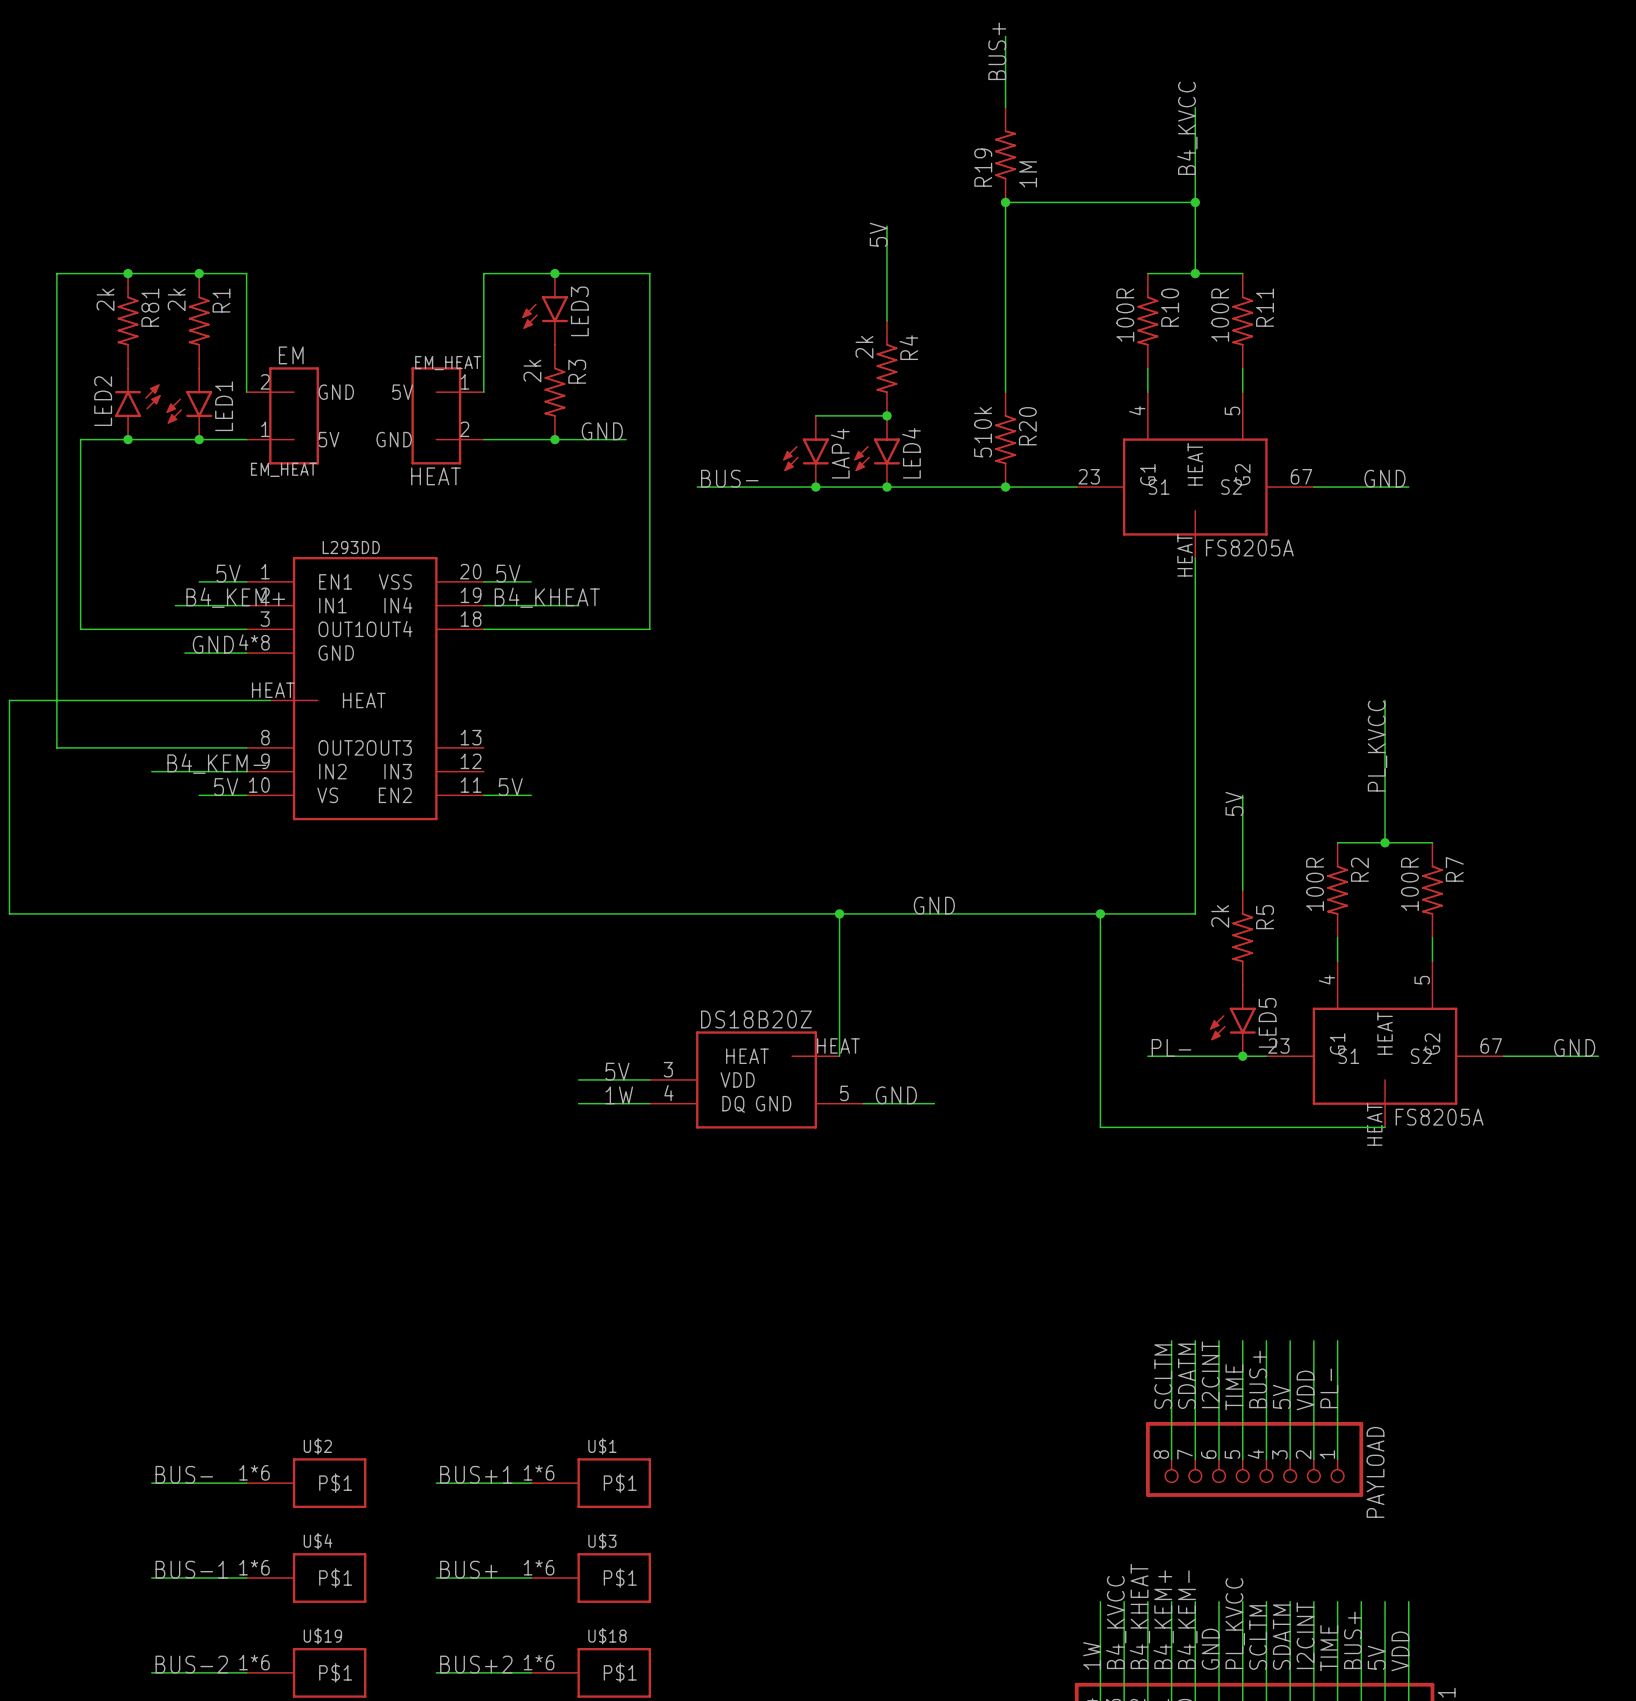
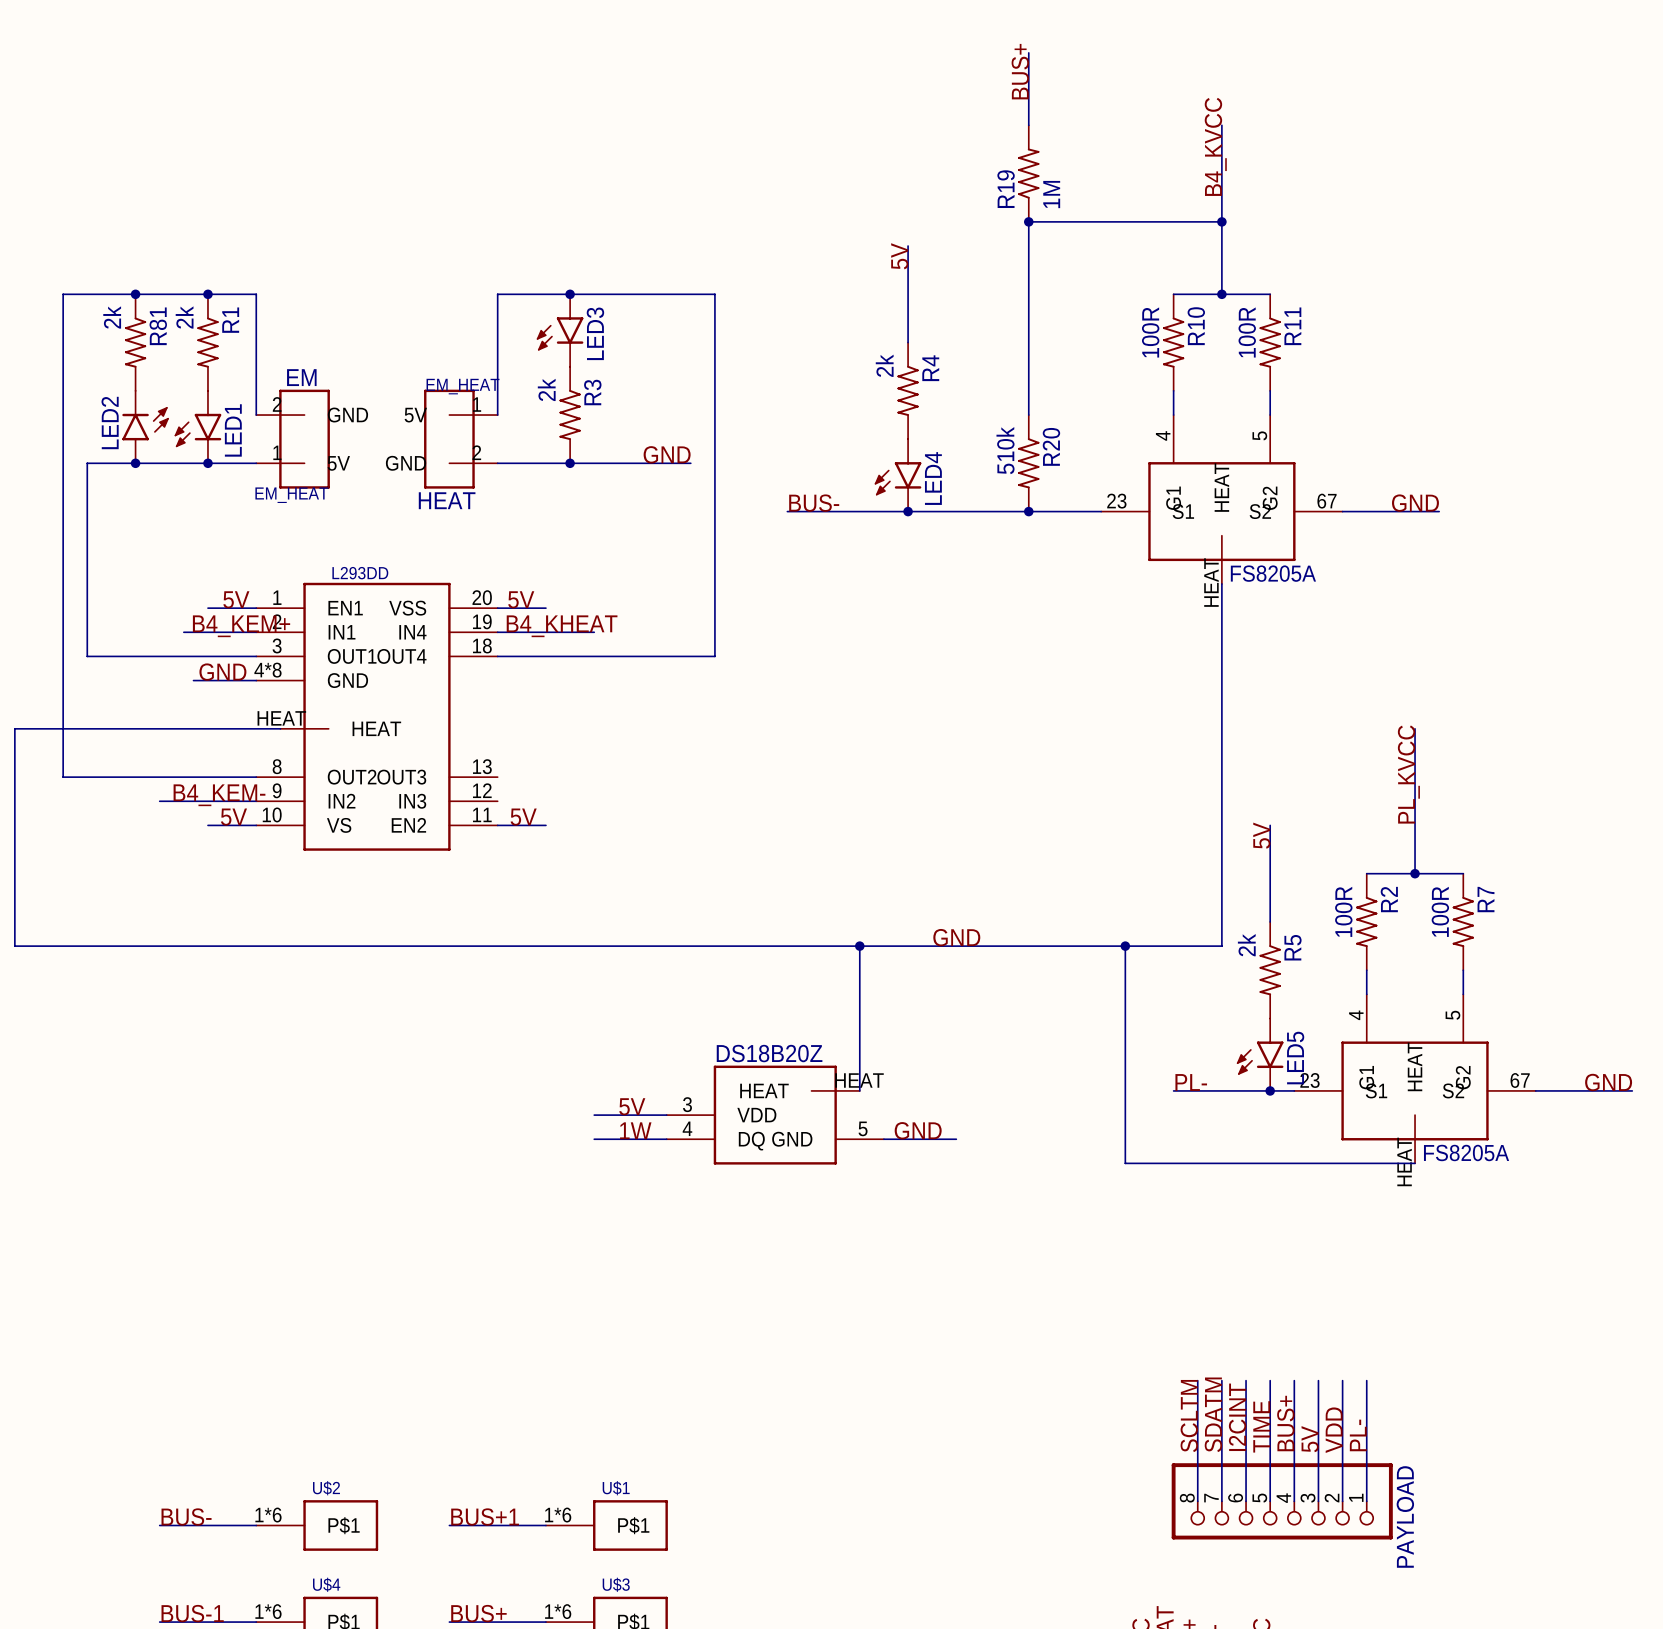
wire: (649, 273) (649, 629) -> (666, 294) (714, 294) (714, 656) (666, 656)
wire: (815, 415) (886, 415) -> none
junction: (886, 415) -> none
label position: GND (602, 431) -> GND (667, 454)
wire: none -> (642, 463) (690, 463)
LAP4: (805, 451) -> none
label position: BUS- (729, 478) -> BUS- (814, 503)
wire: (697, 487) (768, 487) -> none
junction: (815, 487) -> none

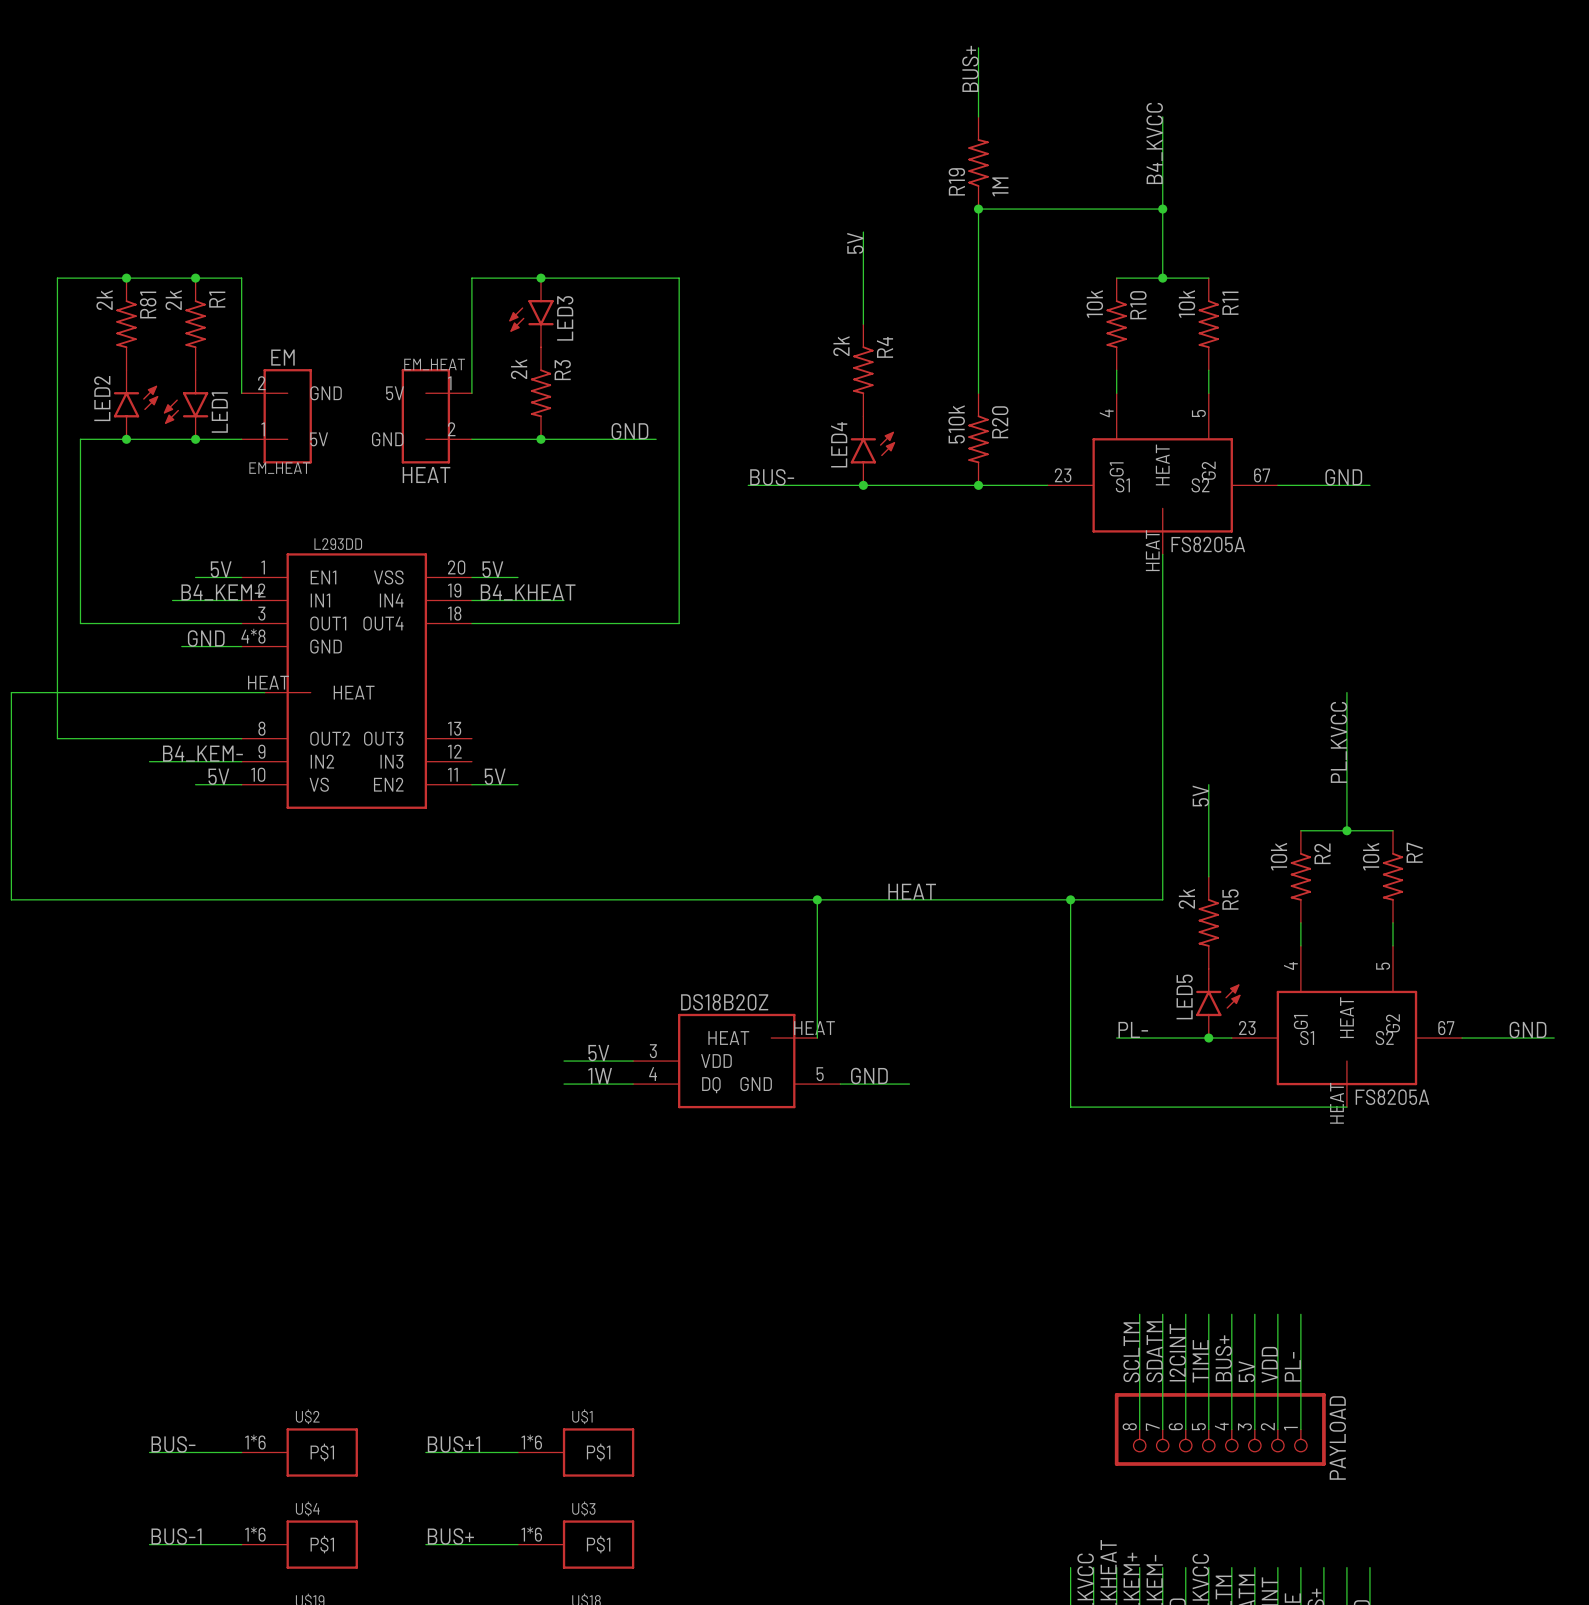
R10 value: 100R (1150, 332) -> 10k (1094, 304)
R11 value: 100R (1247, 332) -> 10k (1186, 304)
LED4 rotation: 0° (898, 478) -> 180° (872, 447)
R2 value: 100R (1343, 911) -> 10k (1279, 856)
R7 value: 100R (1440, 911) -> 10k (1371, 856)
label: GND (956, 937) -> HEAT (912, 891)
LED5 rotation: 0° (1260, 1058) -> 180° (1218, 1000)

